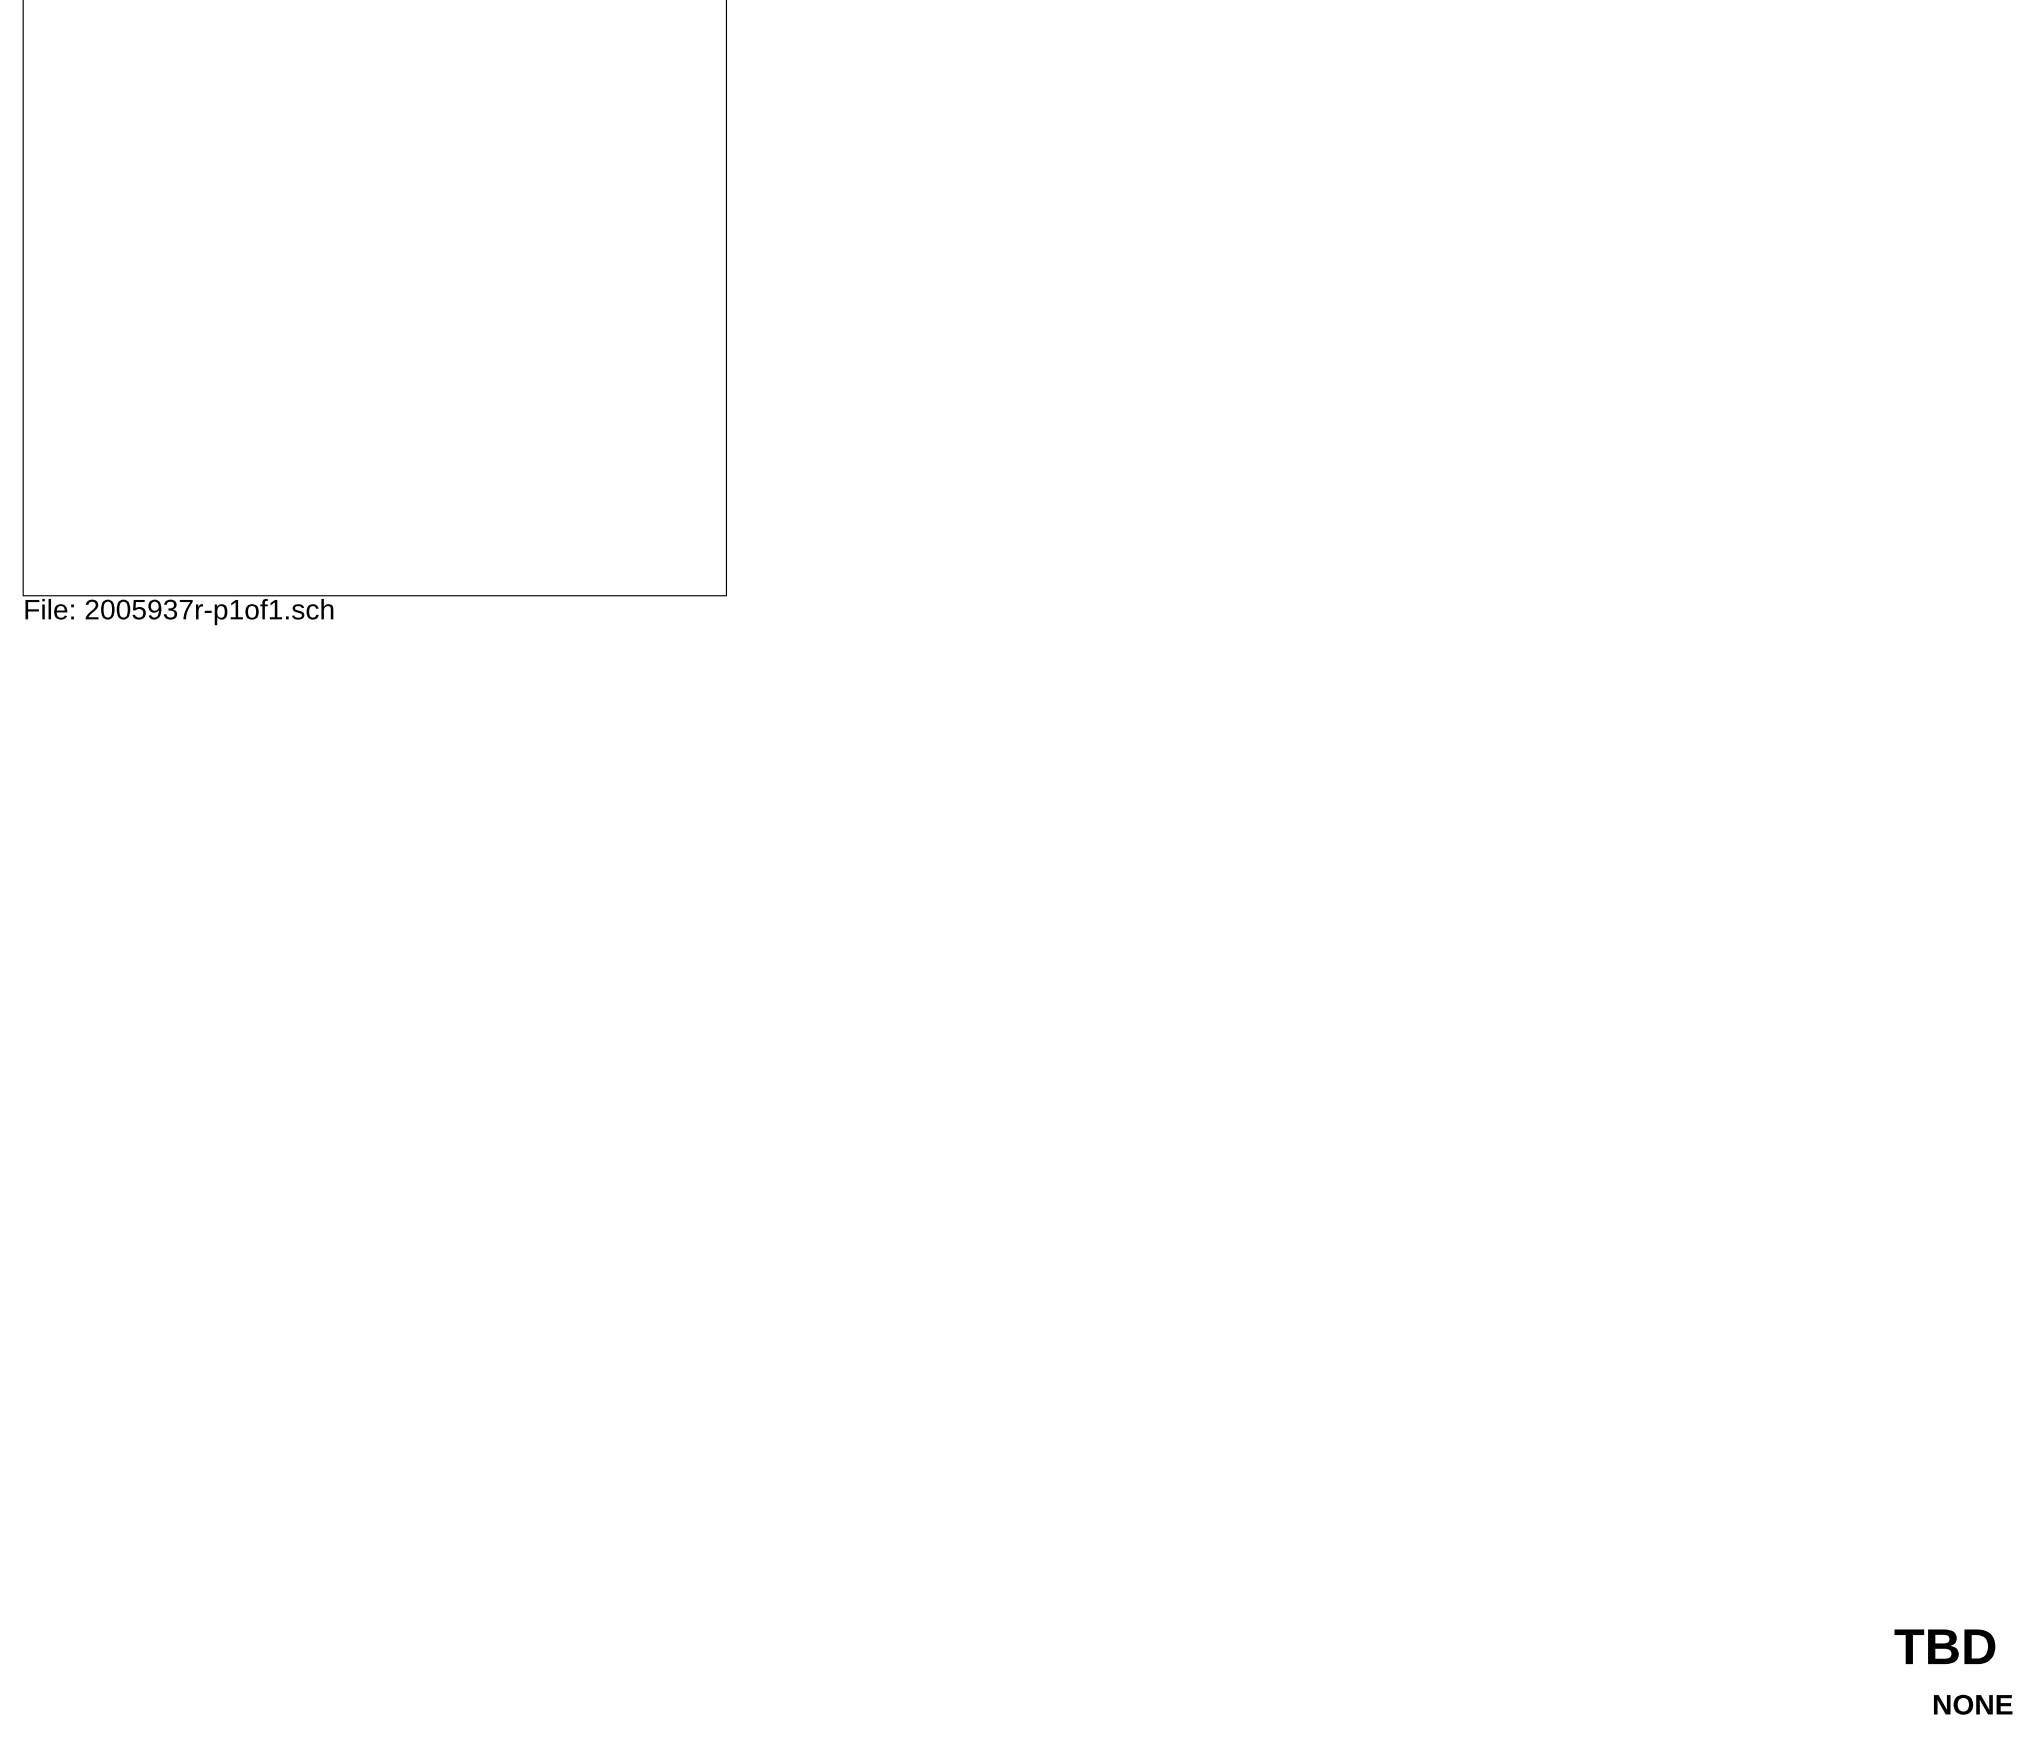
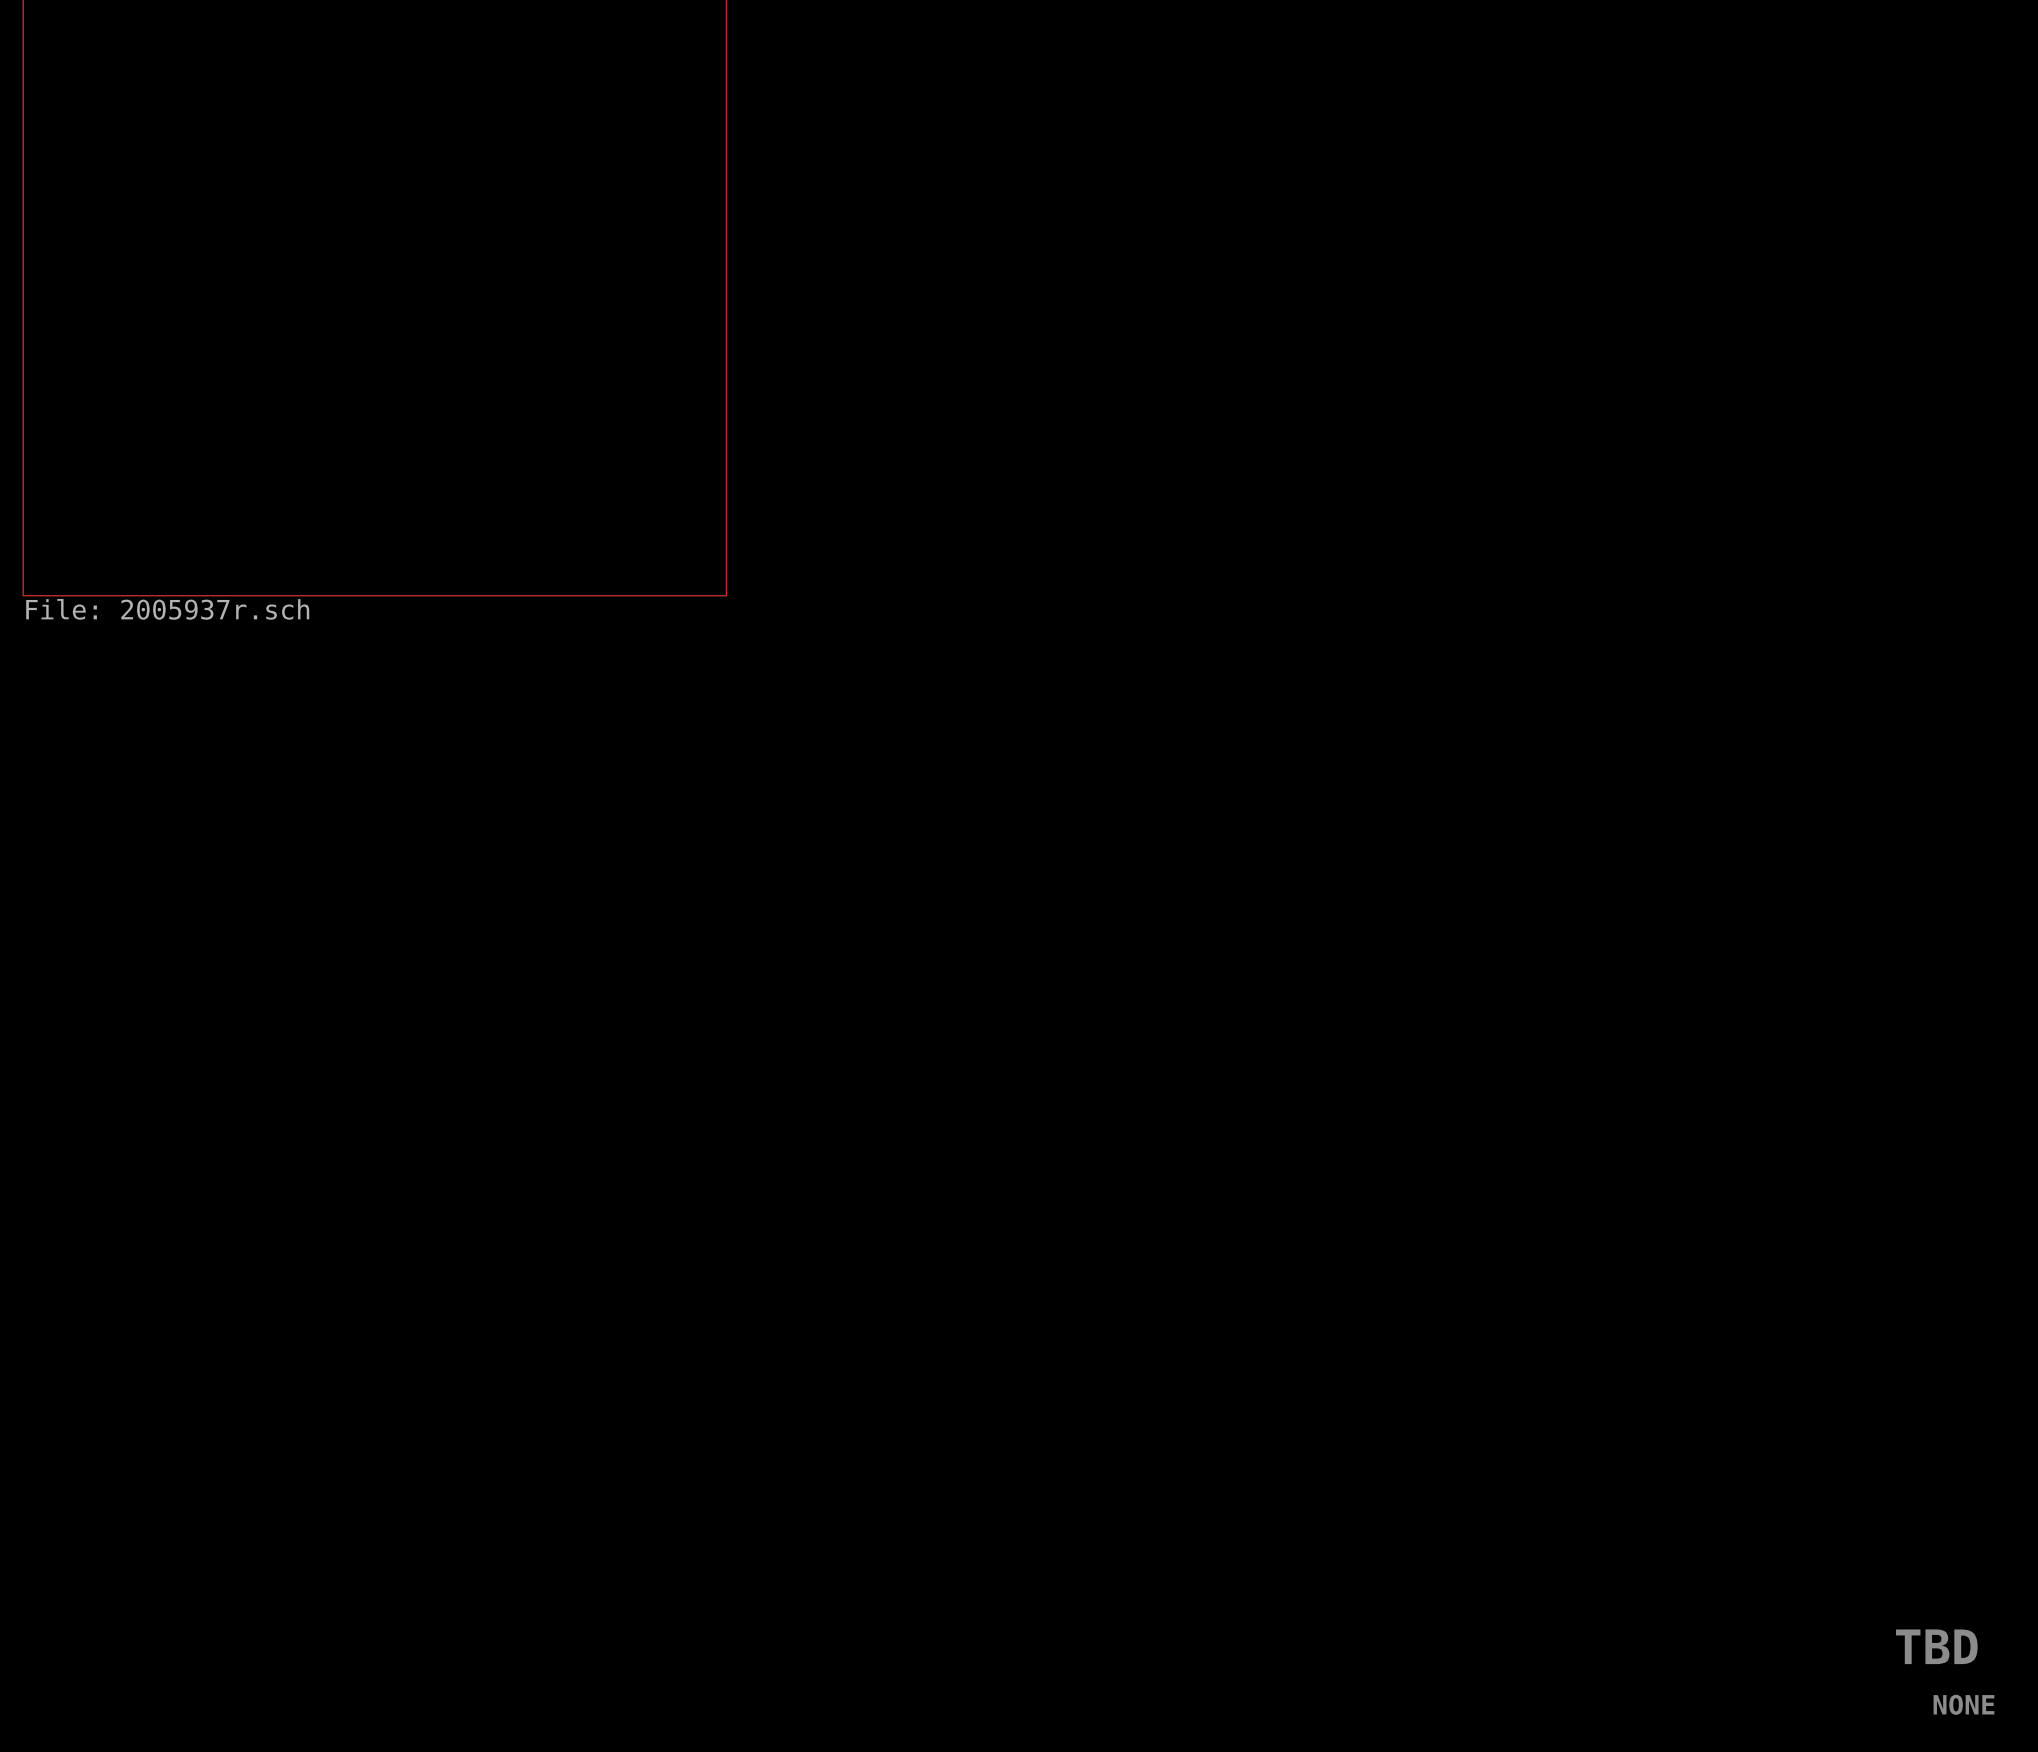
sheet value: File: 2005937r-p1of1.sch (179, 612) -> File: 2005937r.sch (167, 609)

